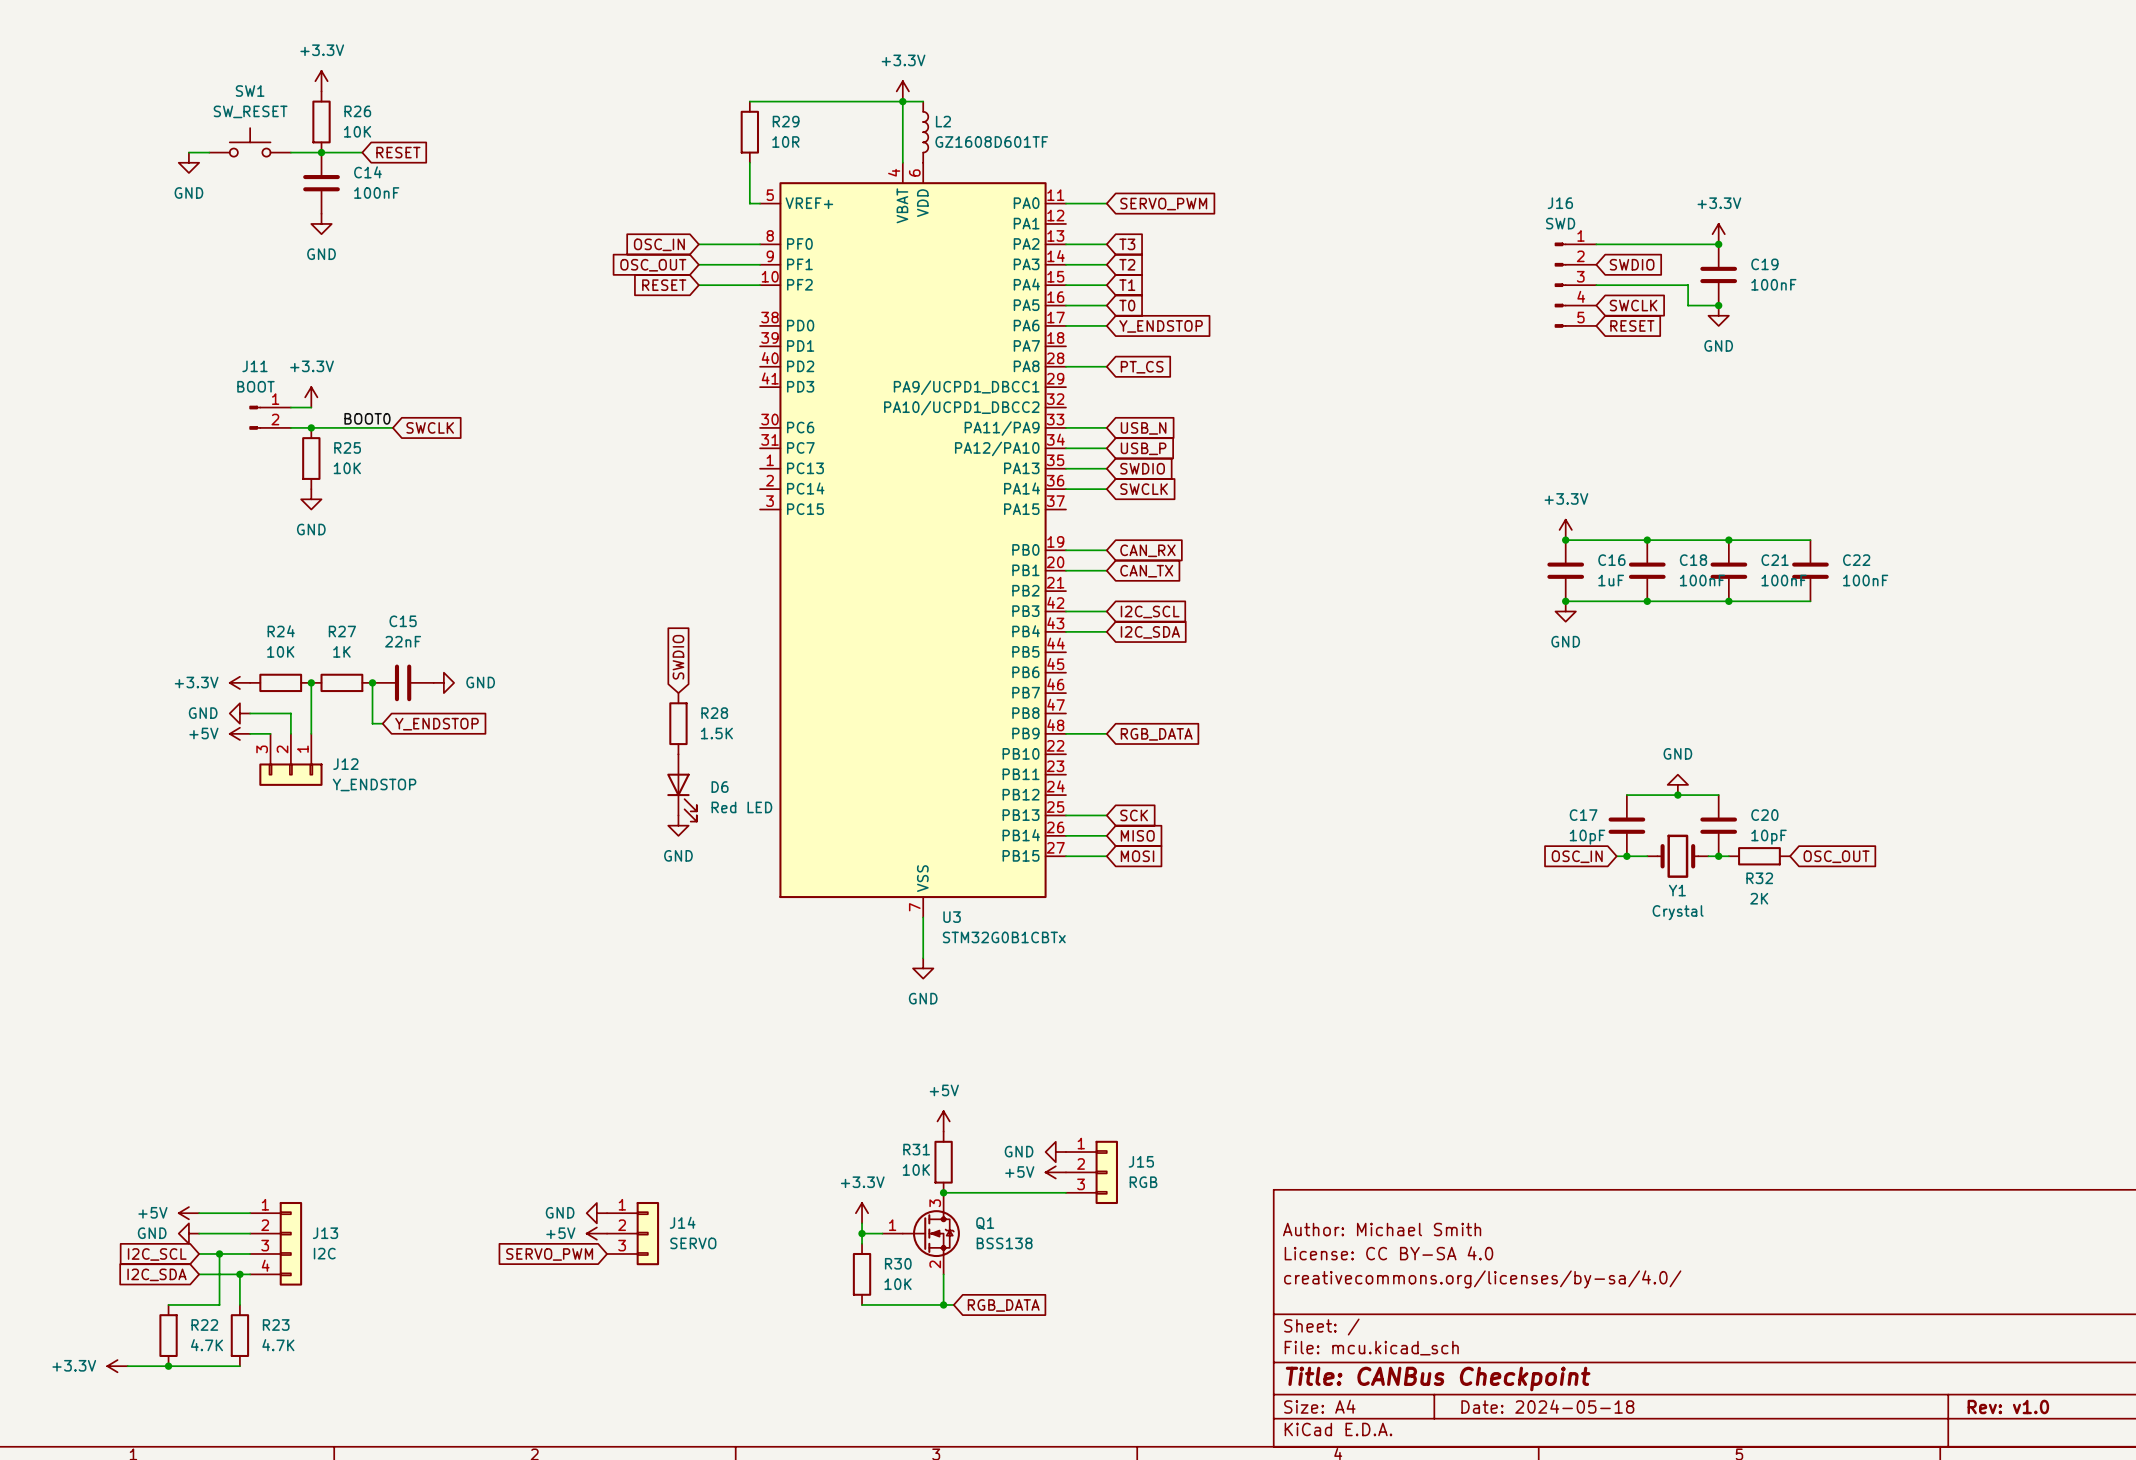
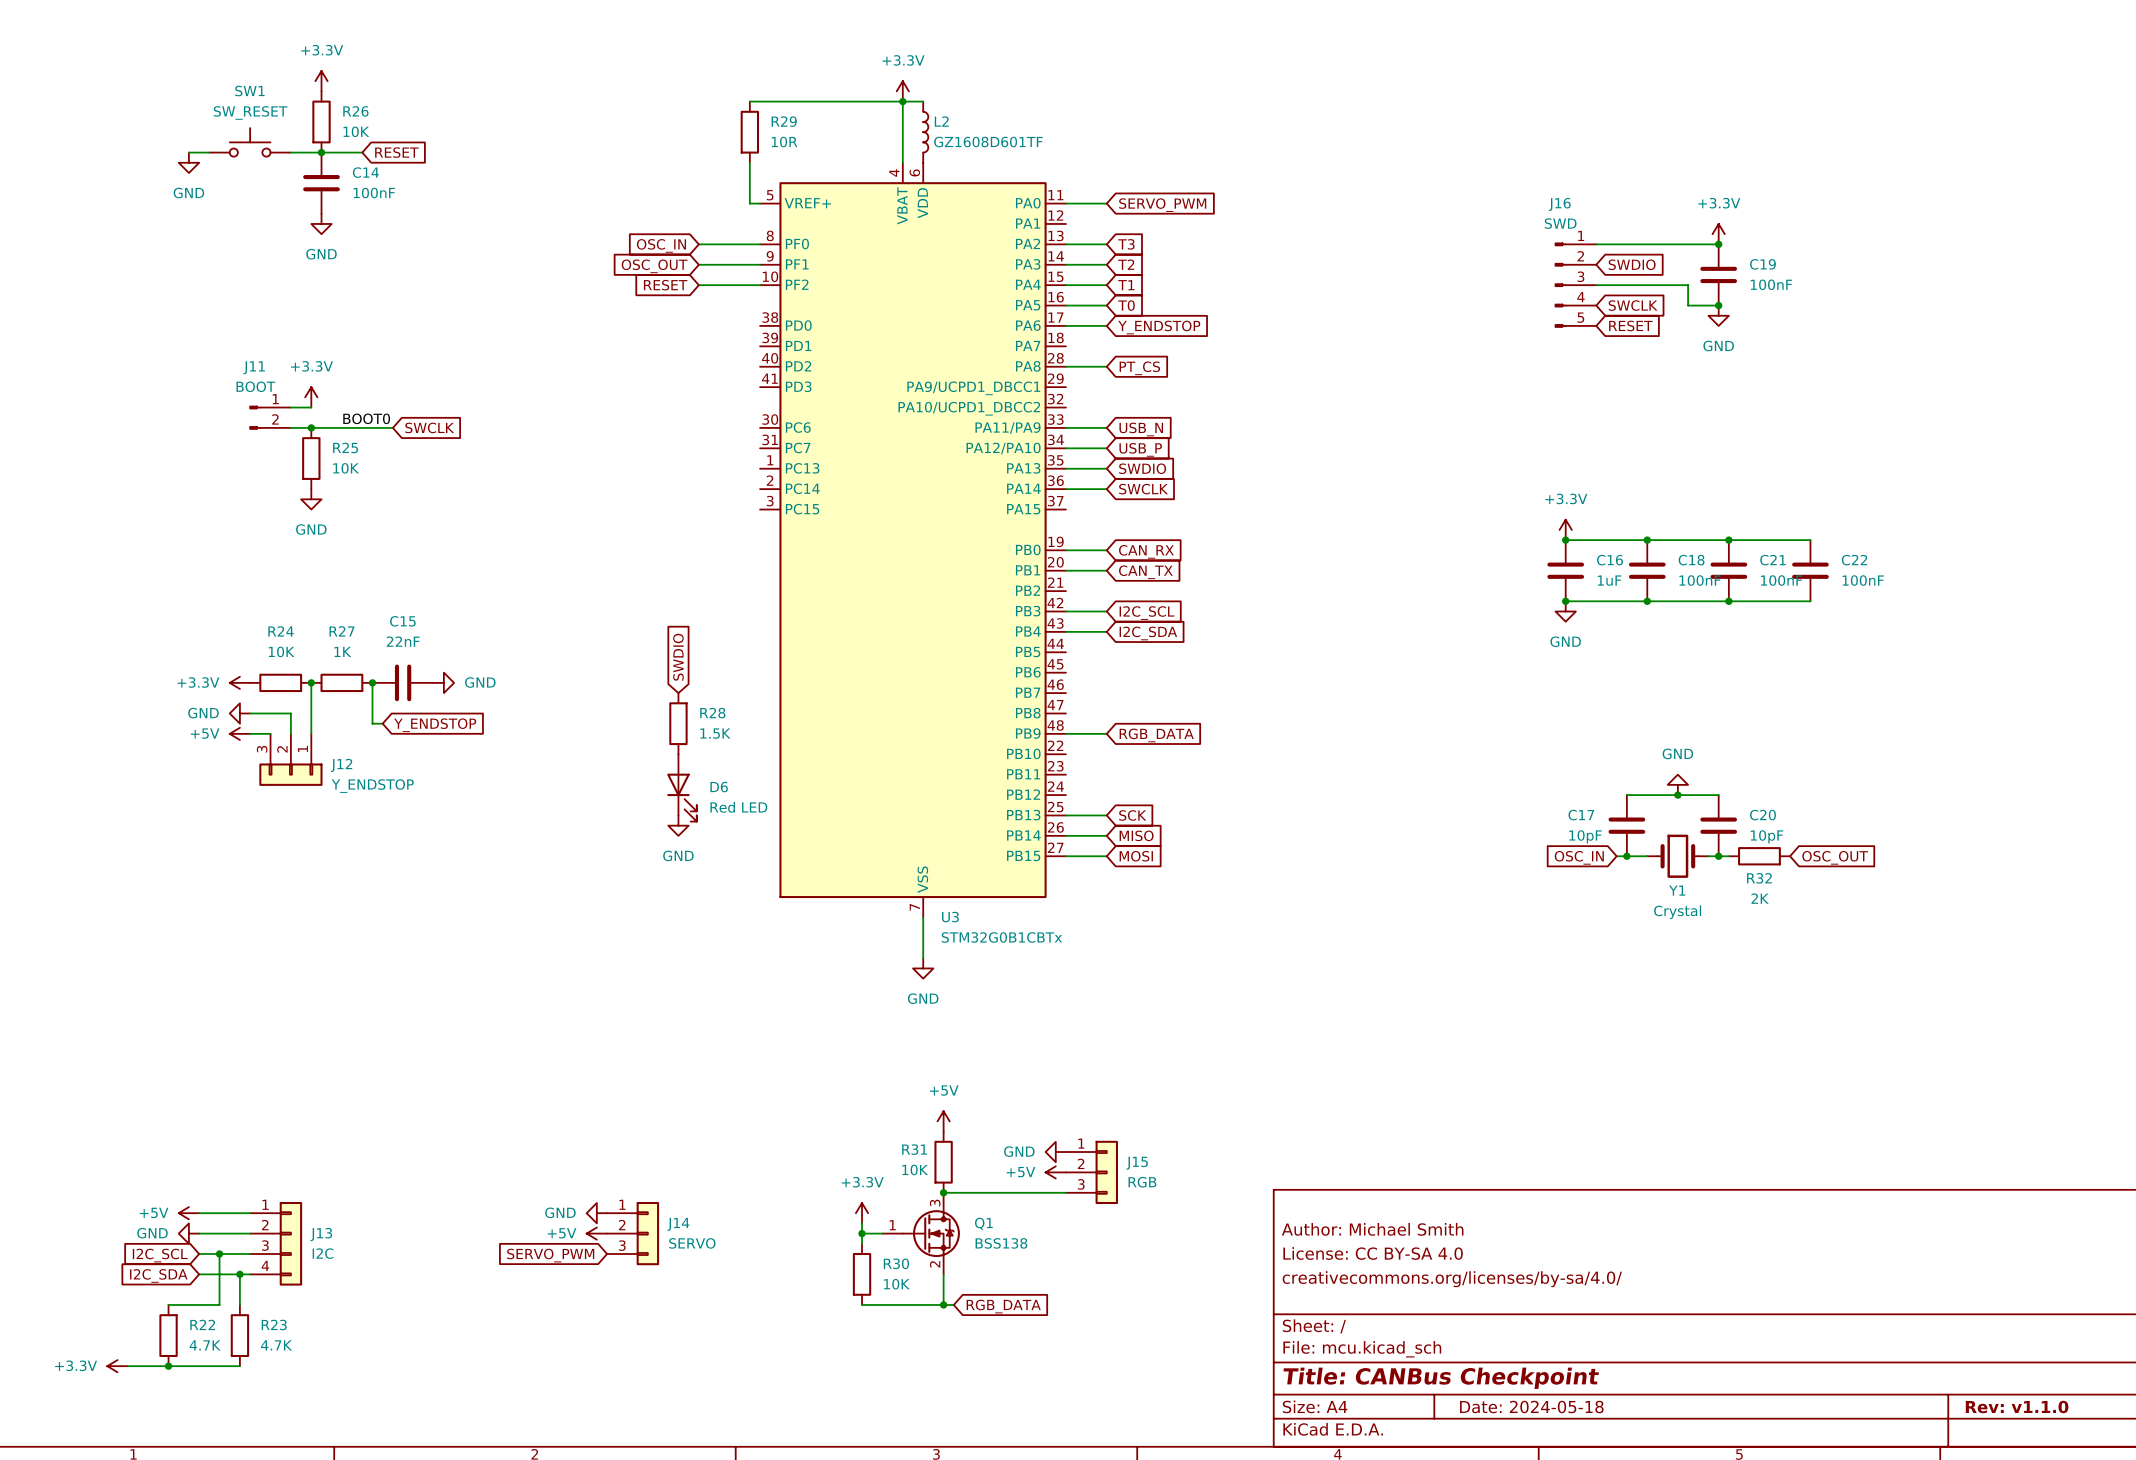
title block: Rev: v1.0 (2008, 1406) -> Rev: v1.1.0 (2017, 1407)

